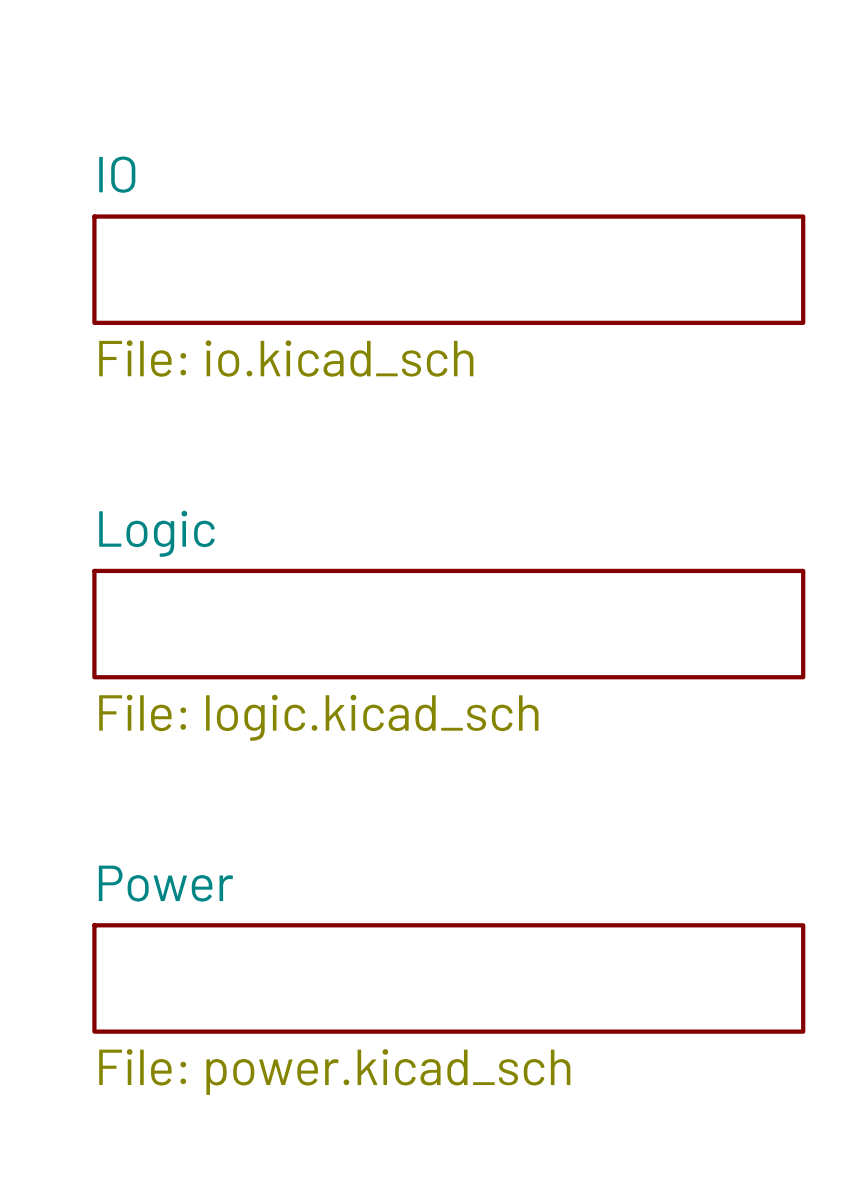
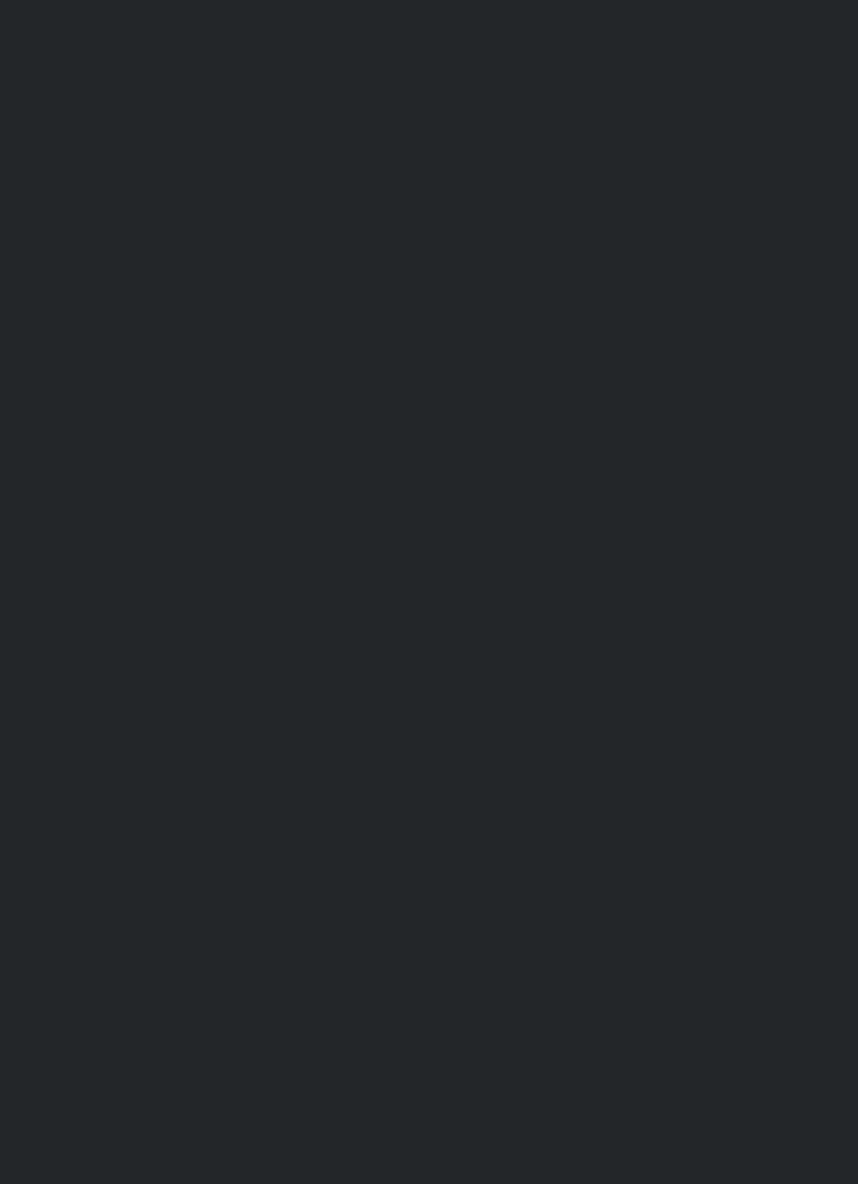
sheet IO: File: io.kicad_sch (448, 269) -> none
sheet Logic: File: logic.kicad_sch (448, 624) -> none
sheet Power: File: power.kicad_sch (448, 978) -> none

